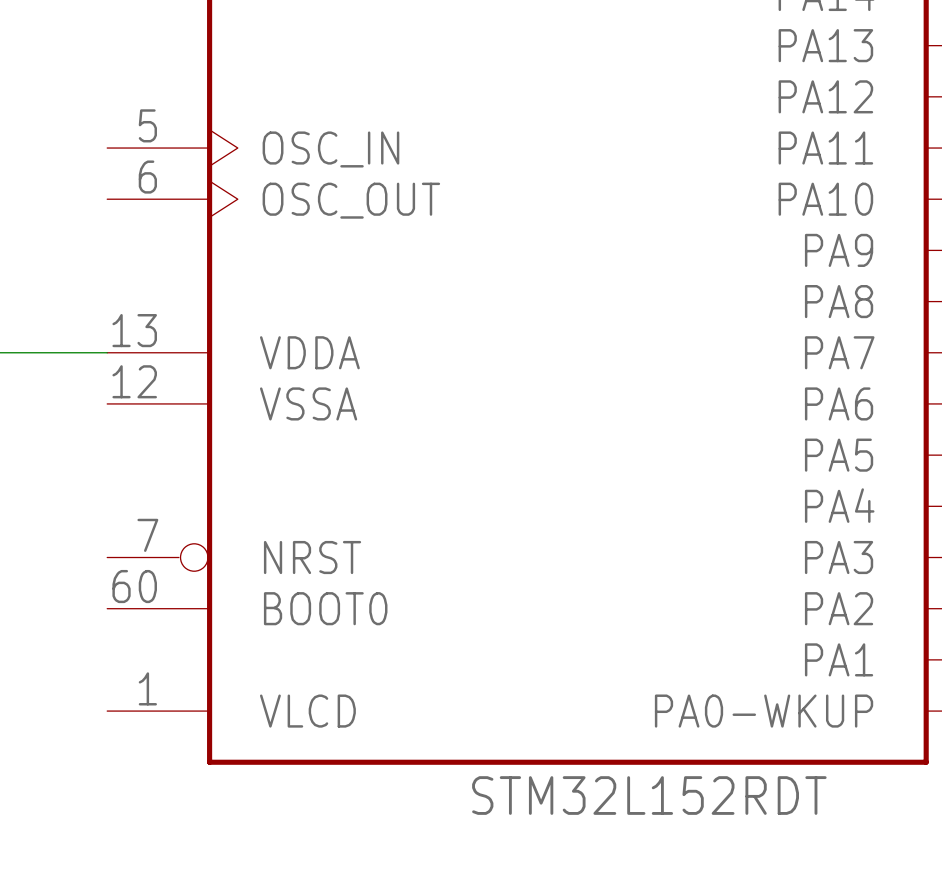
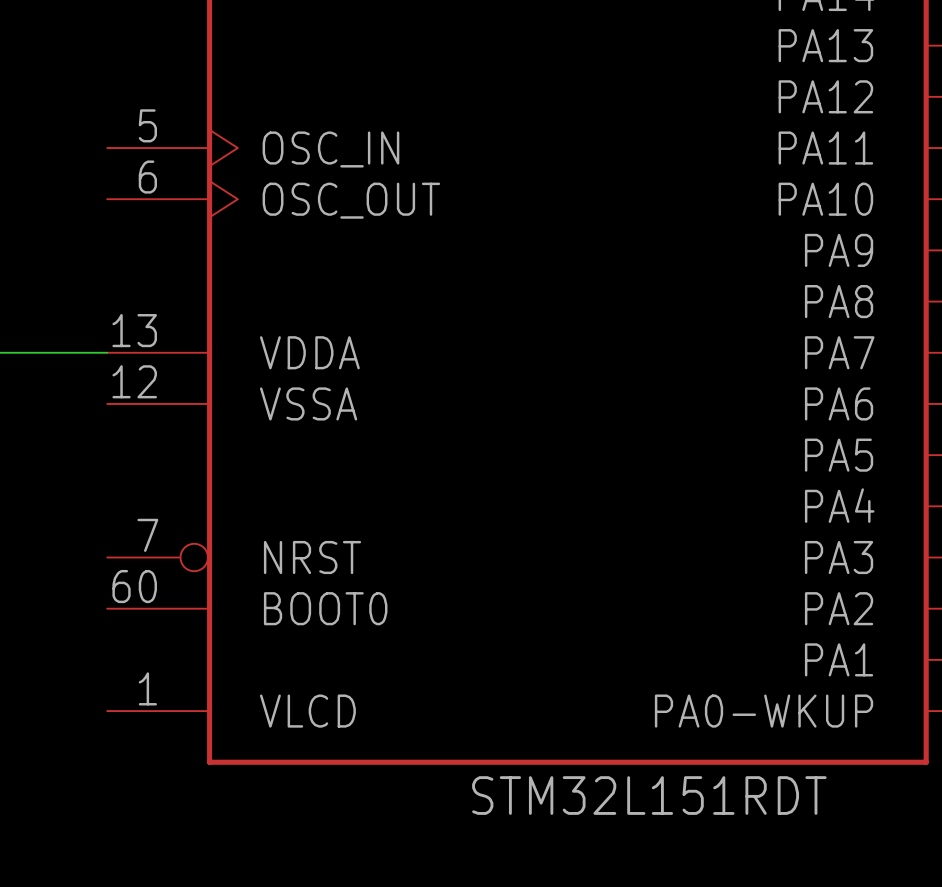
part value: STM32L152RDT (649, 795) -> STM32L151RDT (649, 795)

